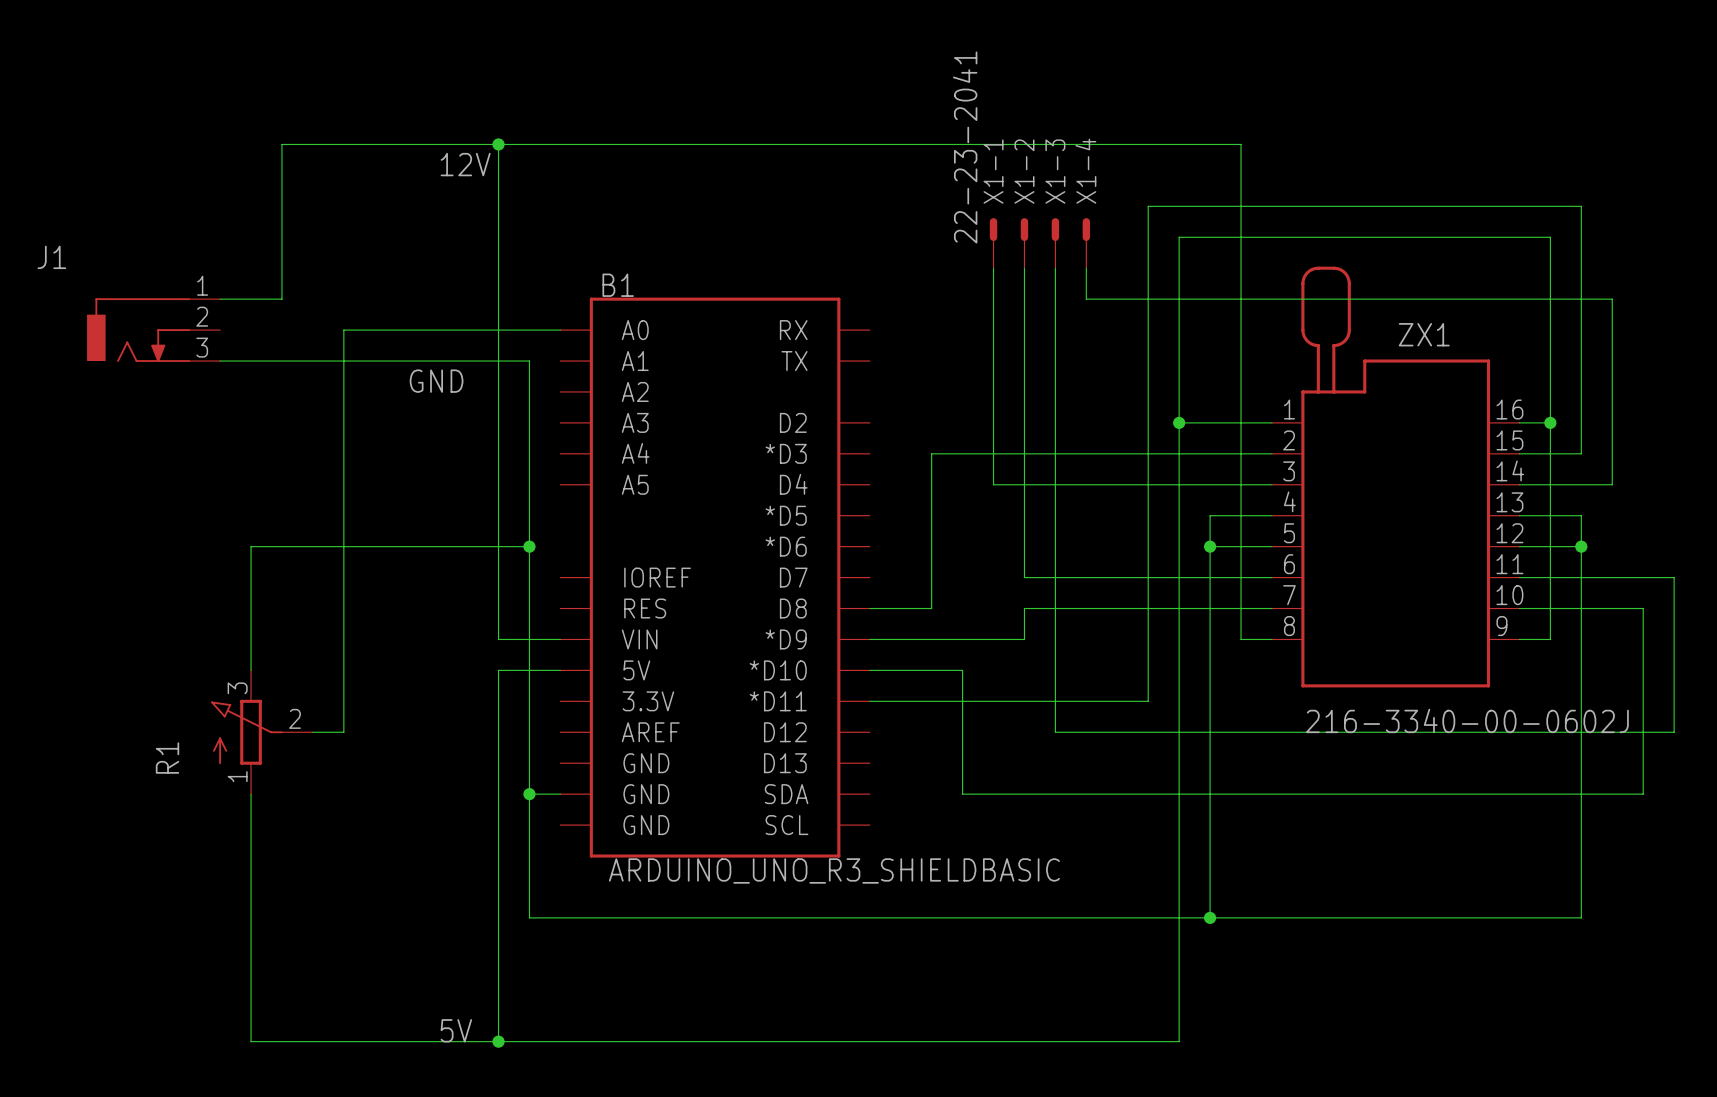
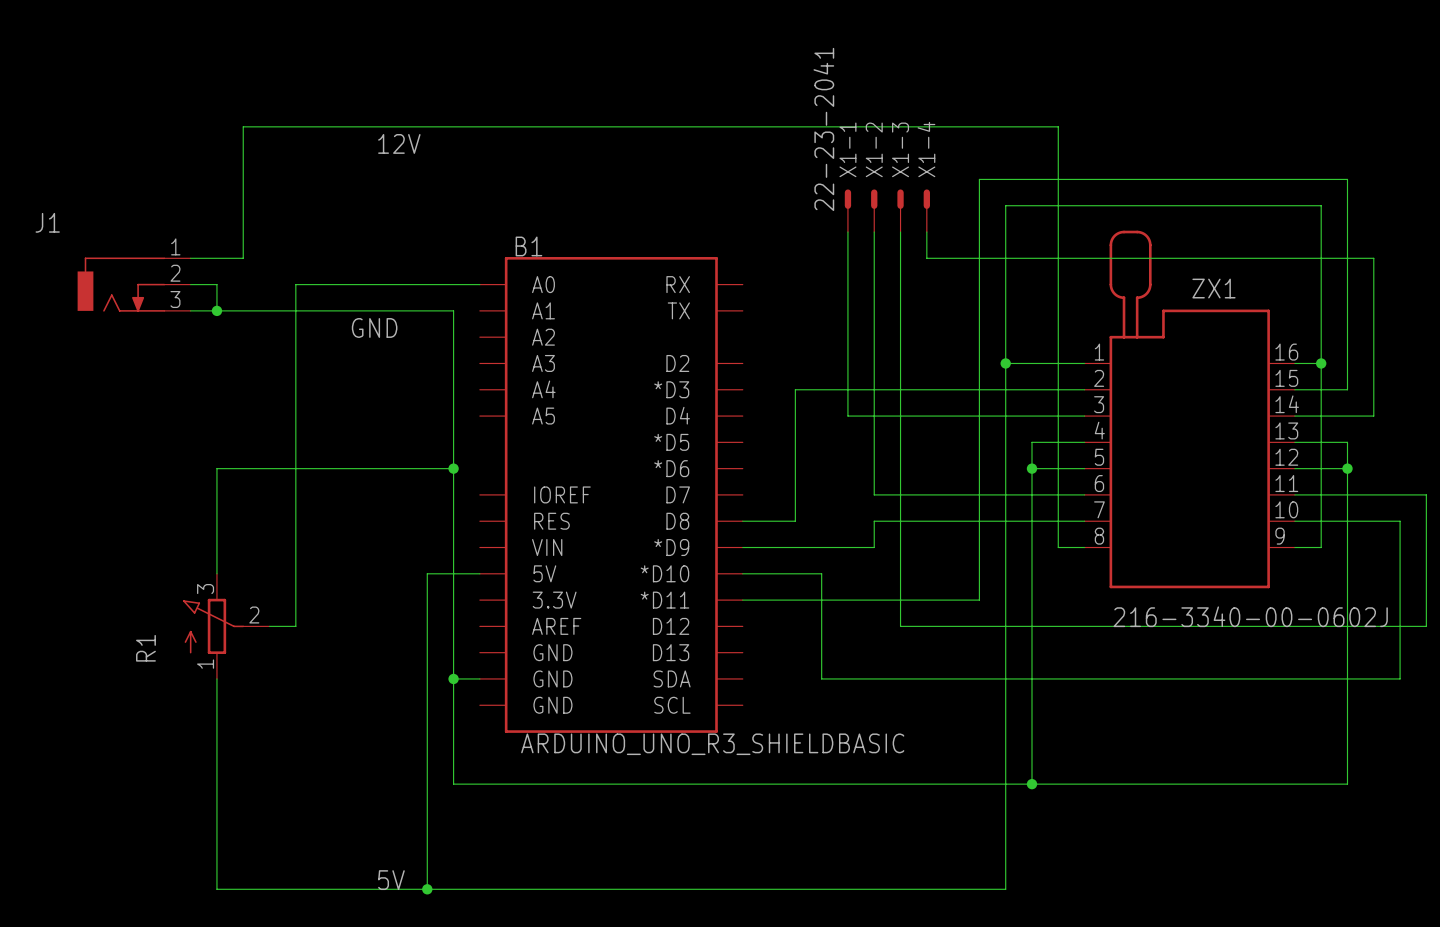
wire: (498, 144) (498, 639) (560, 639) -> none
junction: (498, 144) -> none
wire: none -> (190, 284) (216, 284) (216, 310)
junction: none -> (216, 310)

